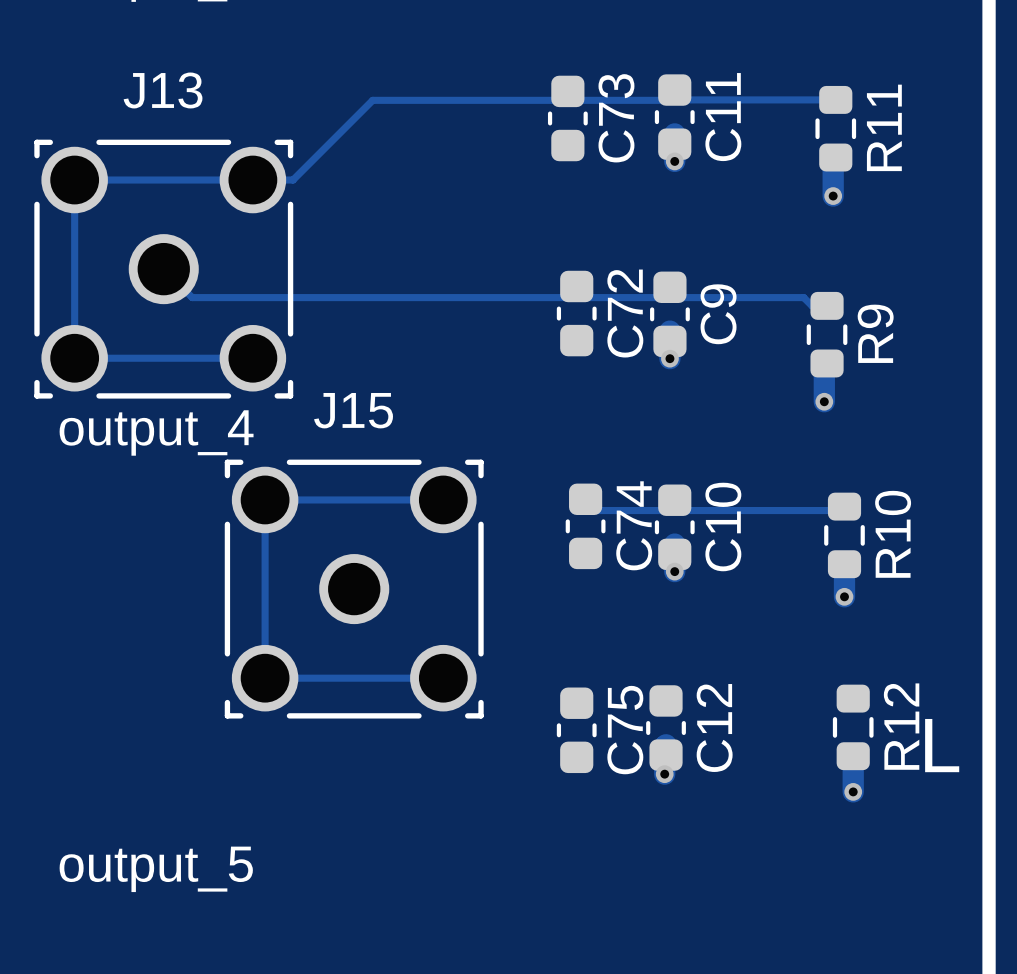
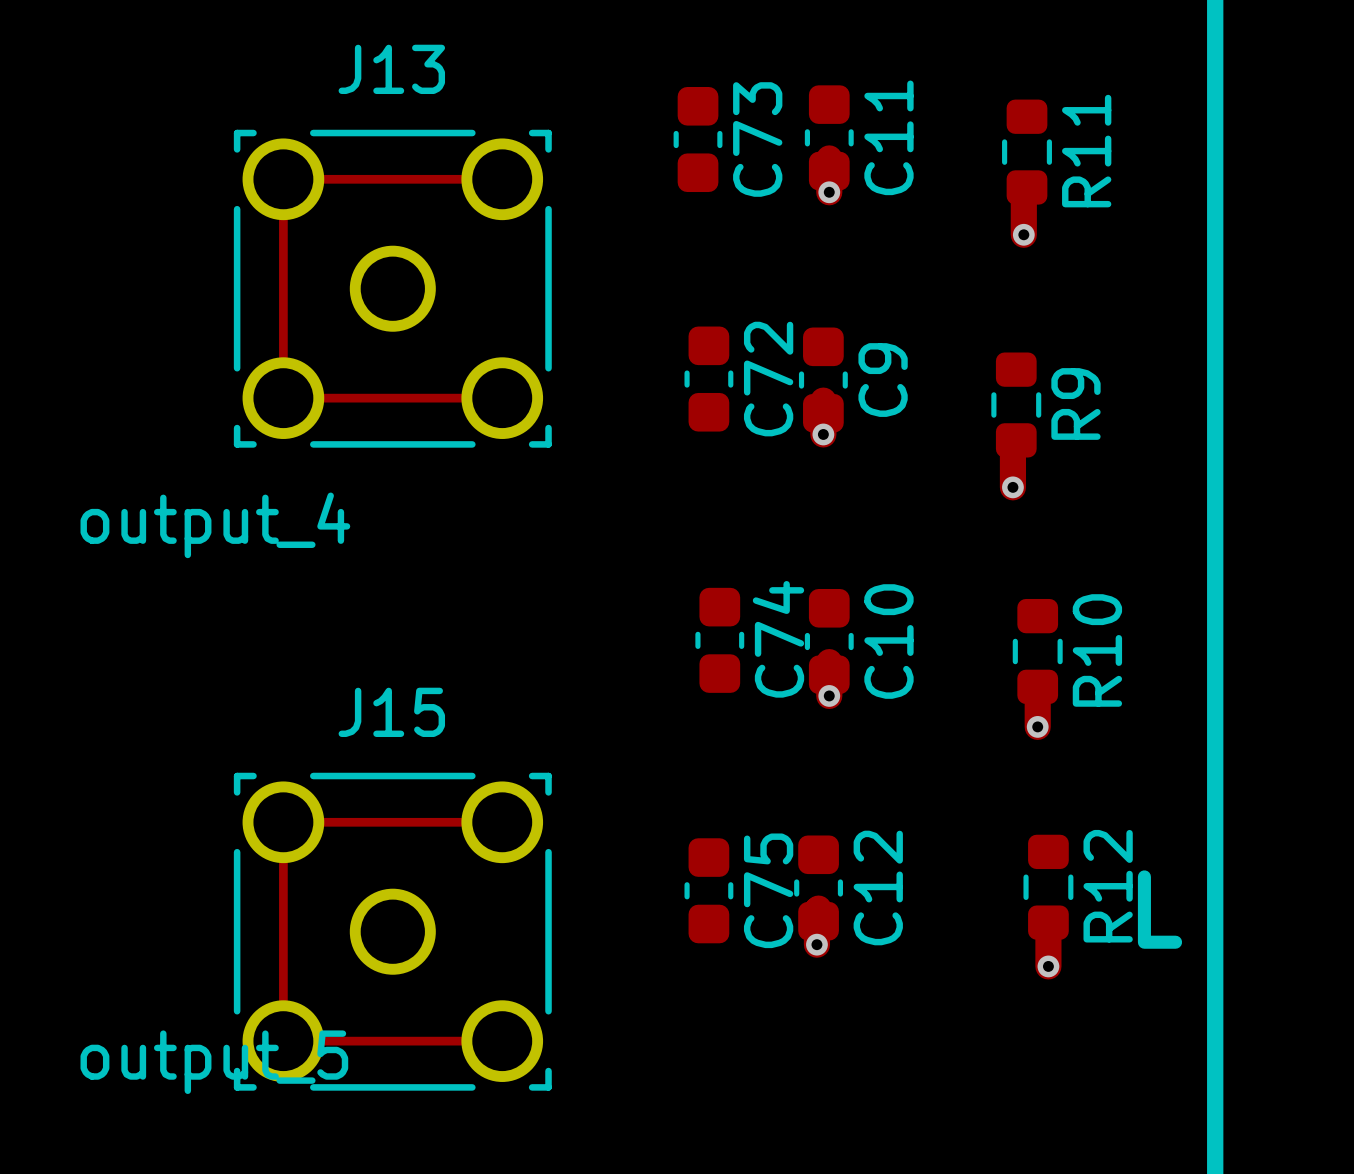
track: (675, 99) (835, 99) -> none
track: (674, 100) (372, 100) (293, 180) (74, 180) (74, 358) (252, 358) -> none
track: none -> (502, 179) (283, 179) (283, 398) (502, 398)
track: (163, 269) (192, 297) (803, 297) (812, 305) (827, 305) -> none
J13 position: (163, 269) -> (392, 288)
track: (443, 499) (265, 499) (265, 678) (443, 678) -> (502, 822) (283, 822) (283, 1041) (502, 1041)
track: (844, 506) (837, 510) (574, 510) -> none
J15 position: (354, 589) -> (392, 931)

